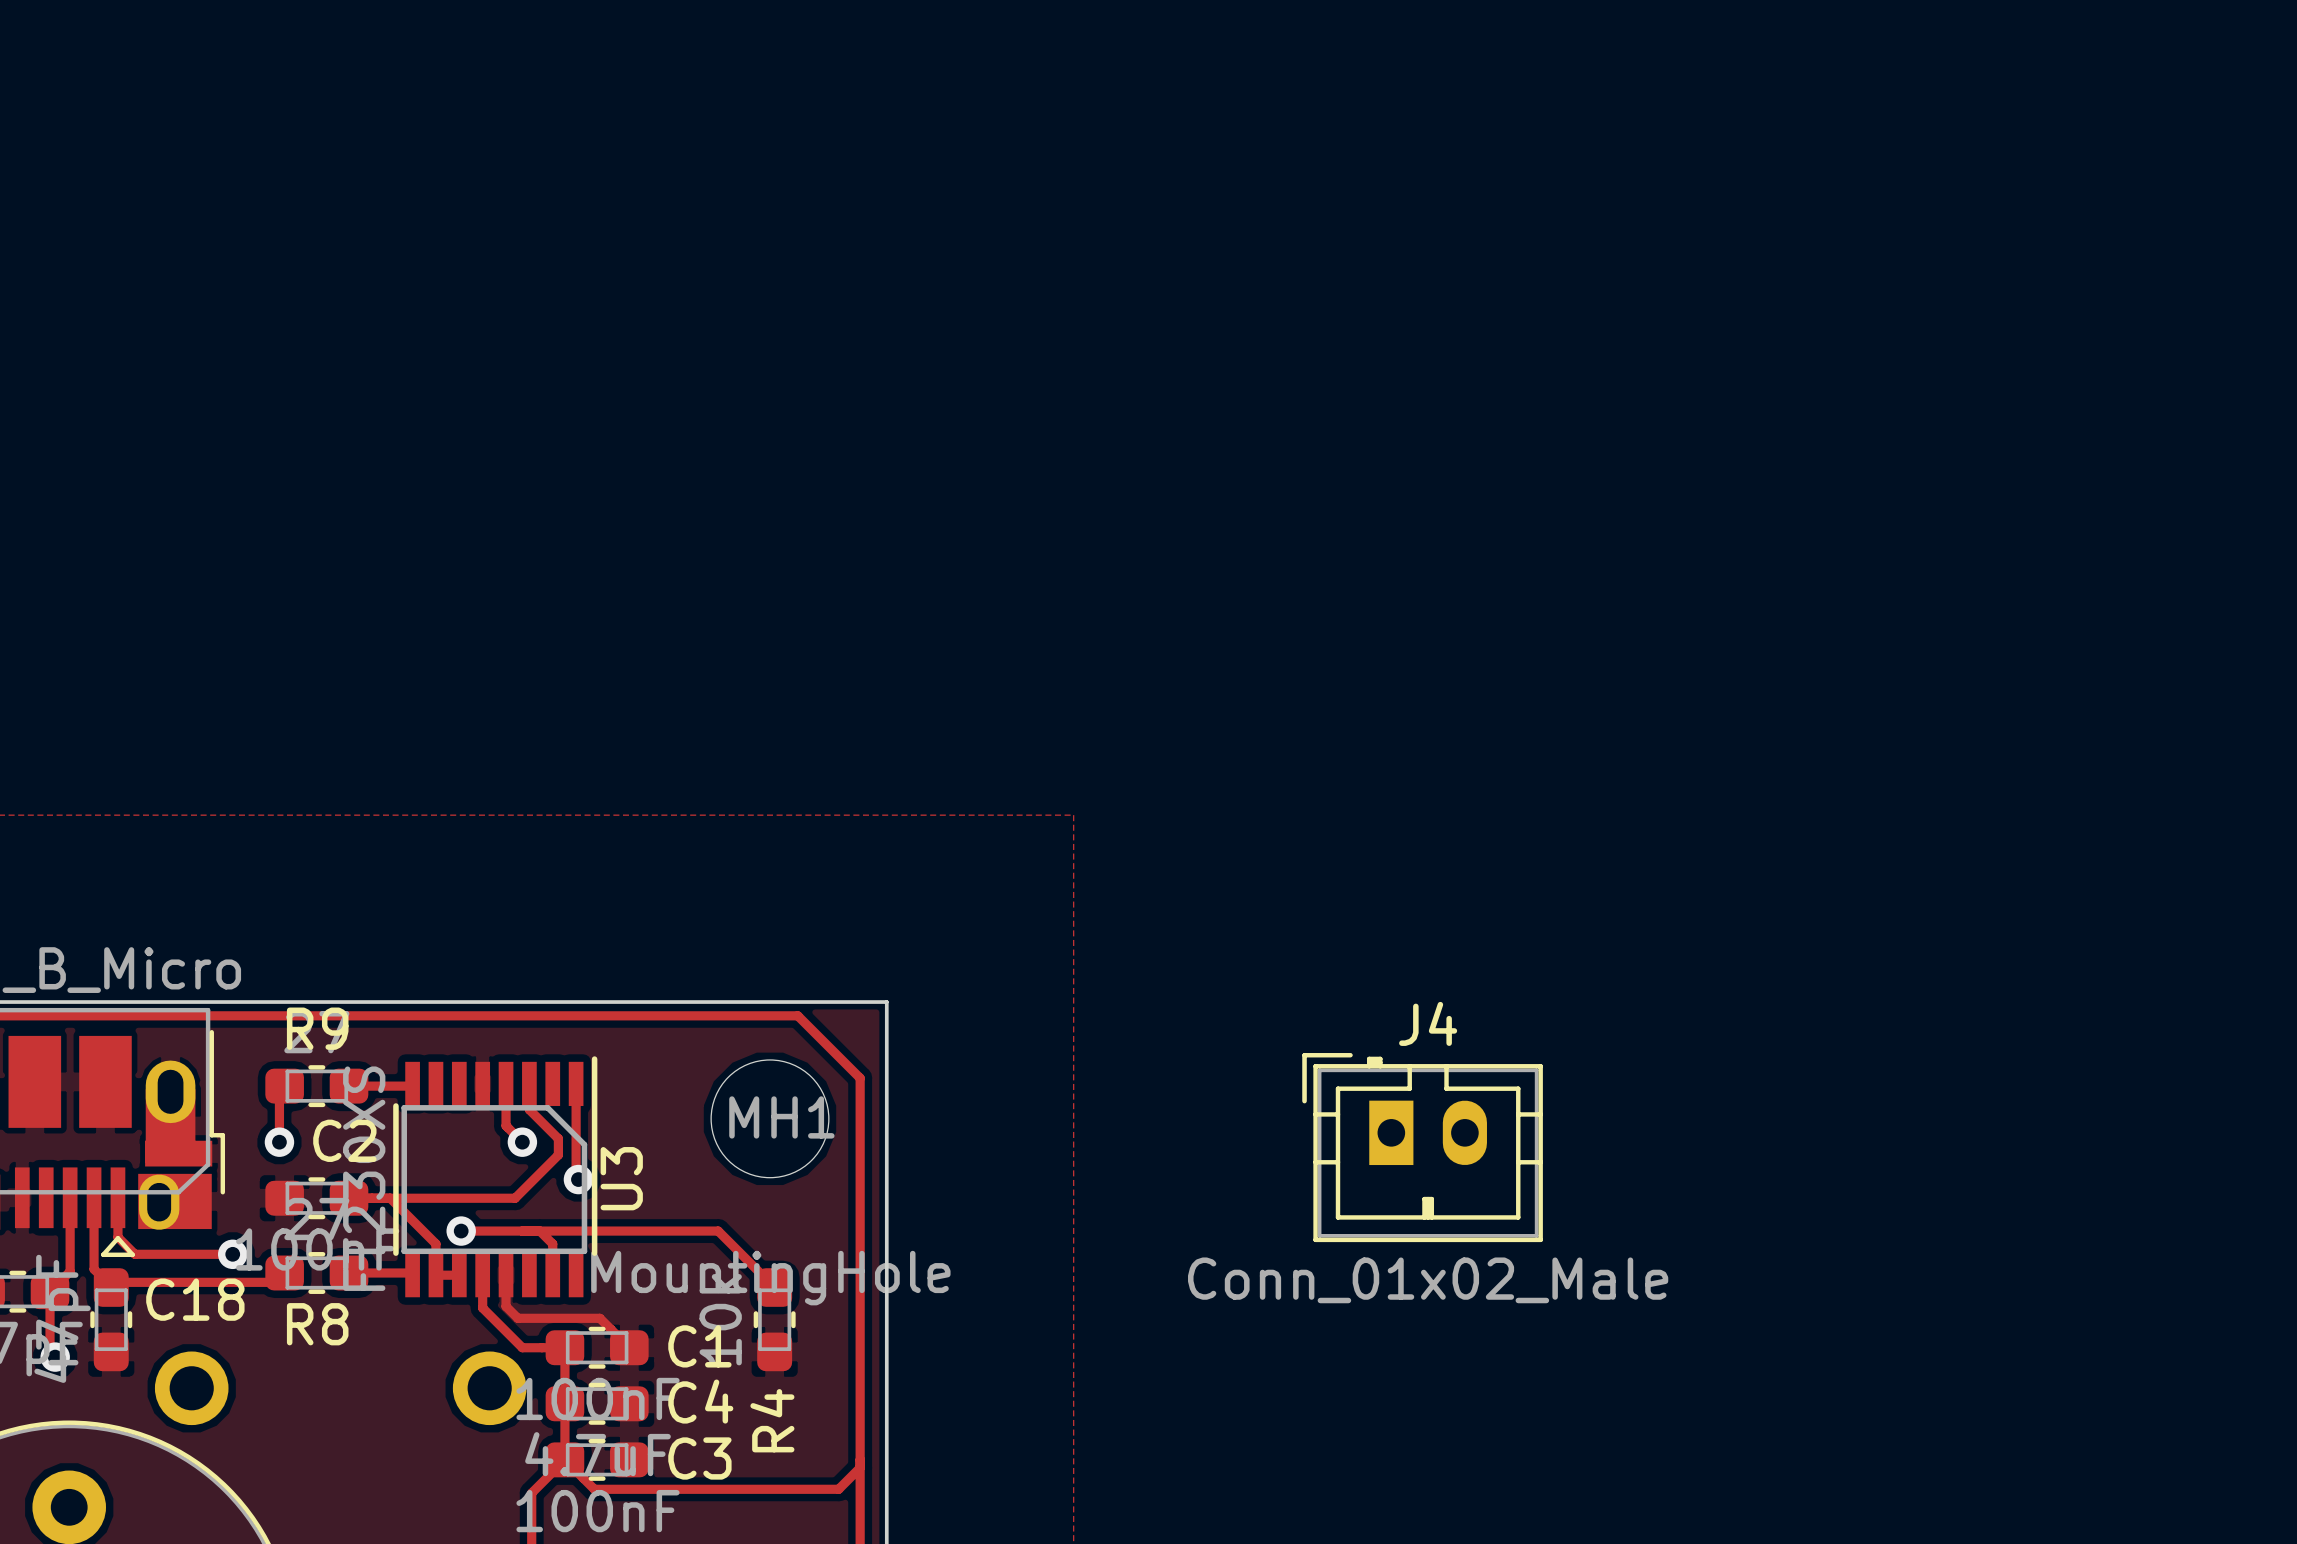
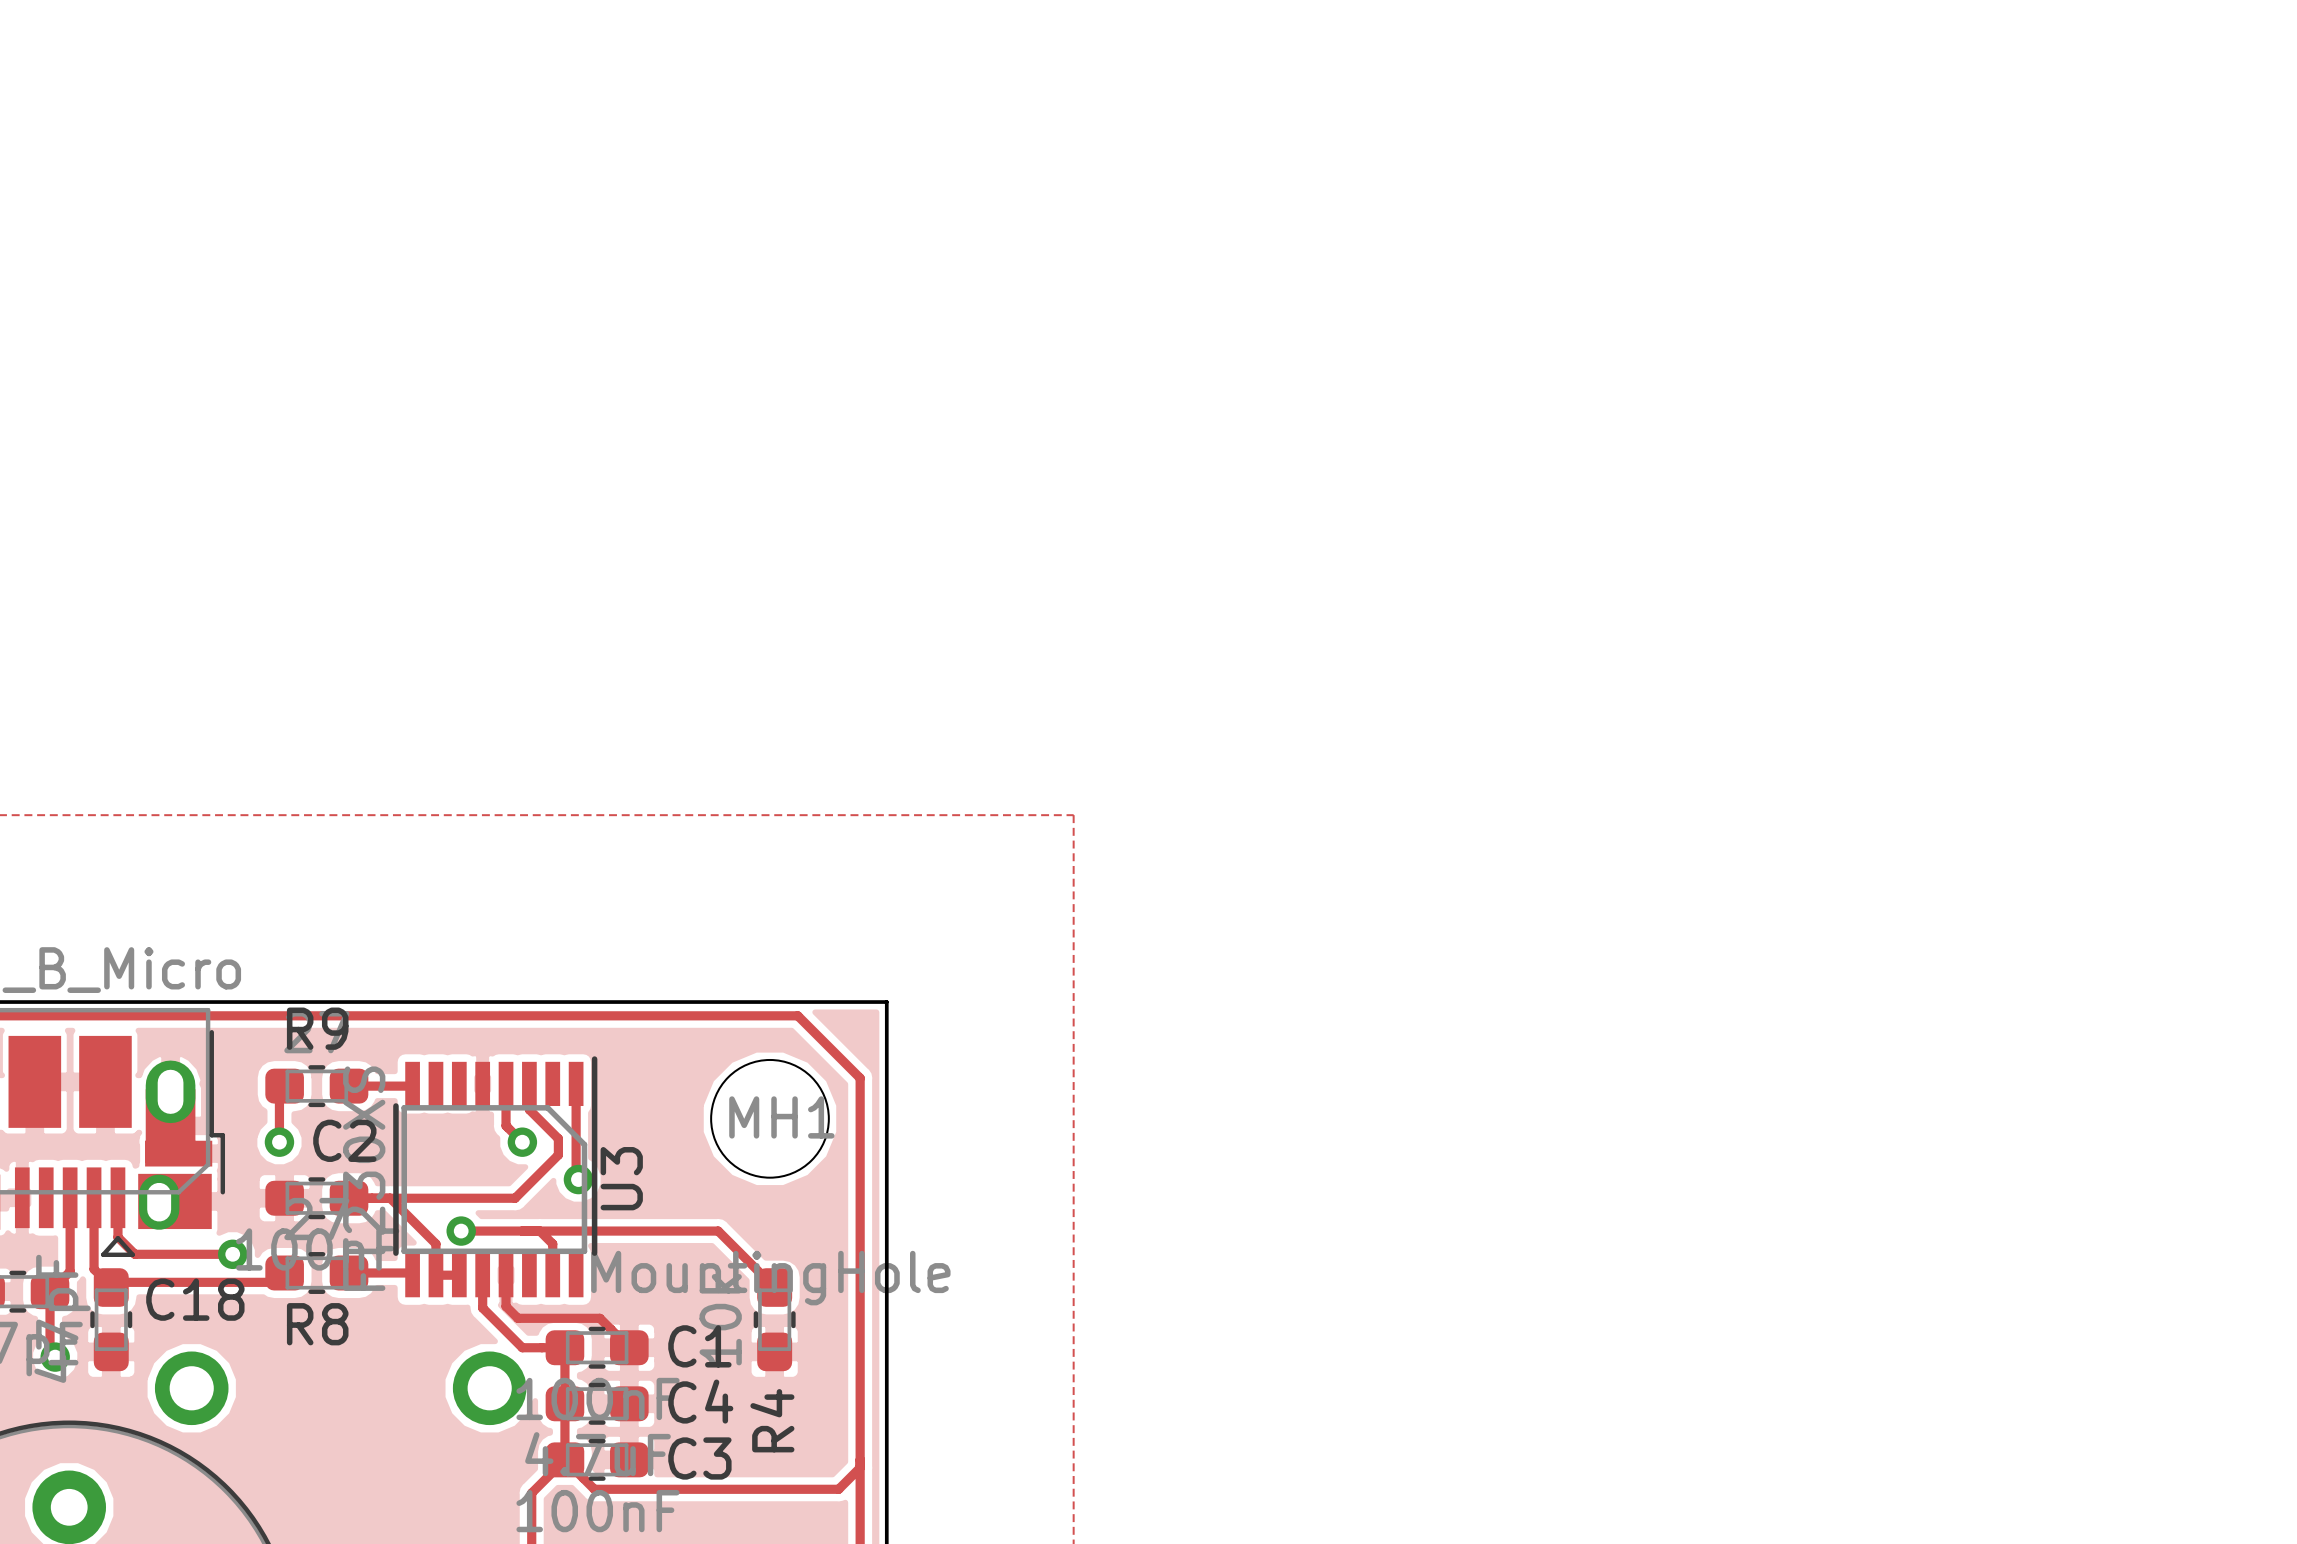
J4: Conn_01x02_Male (1422, 1147) -> none

